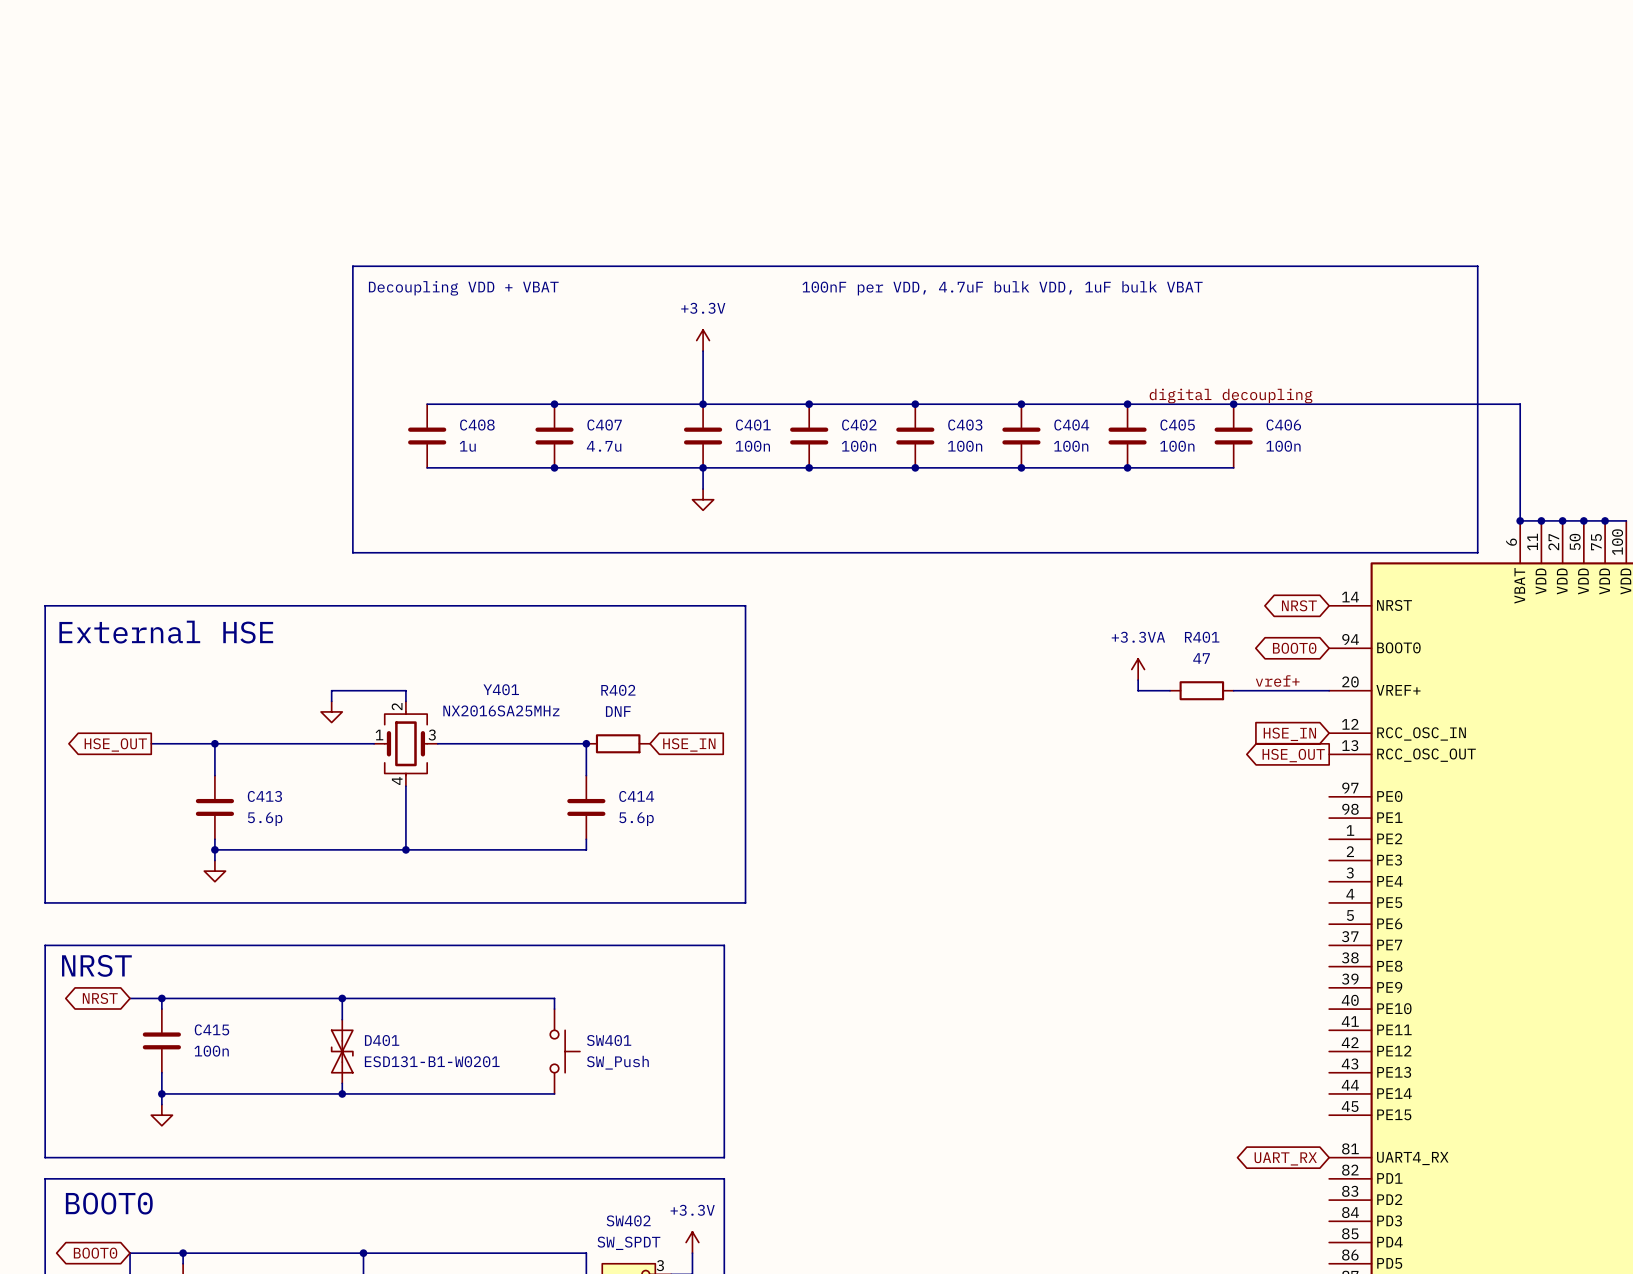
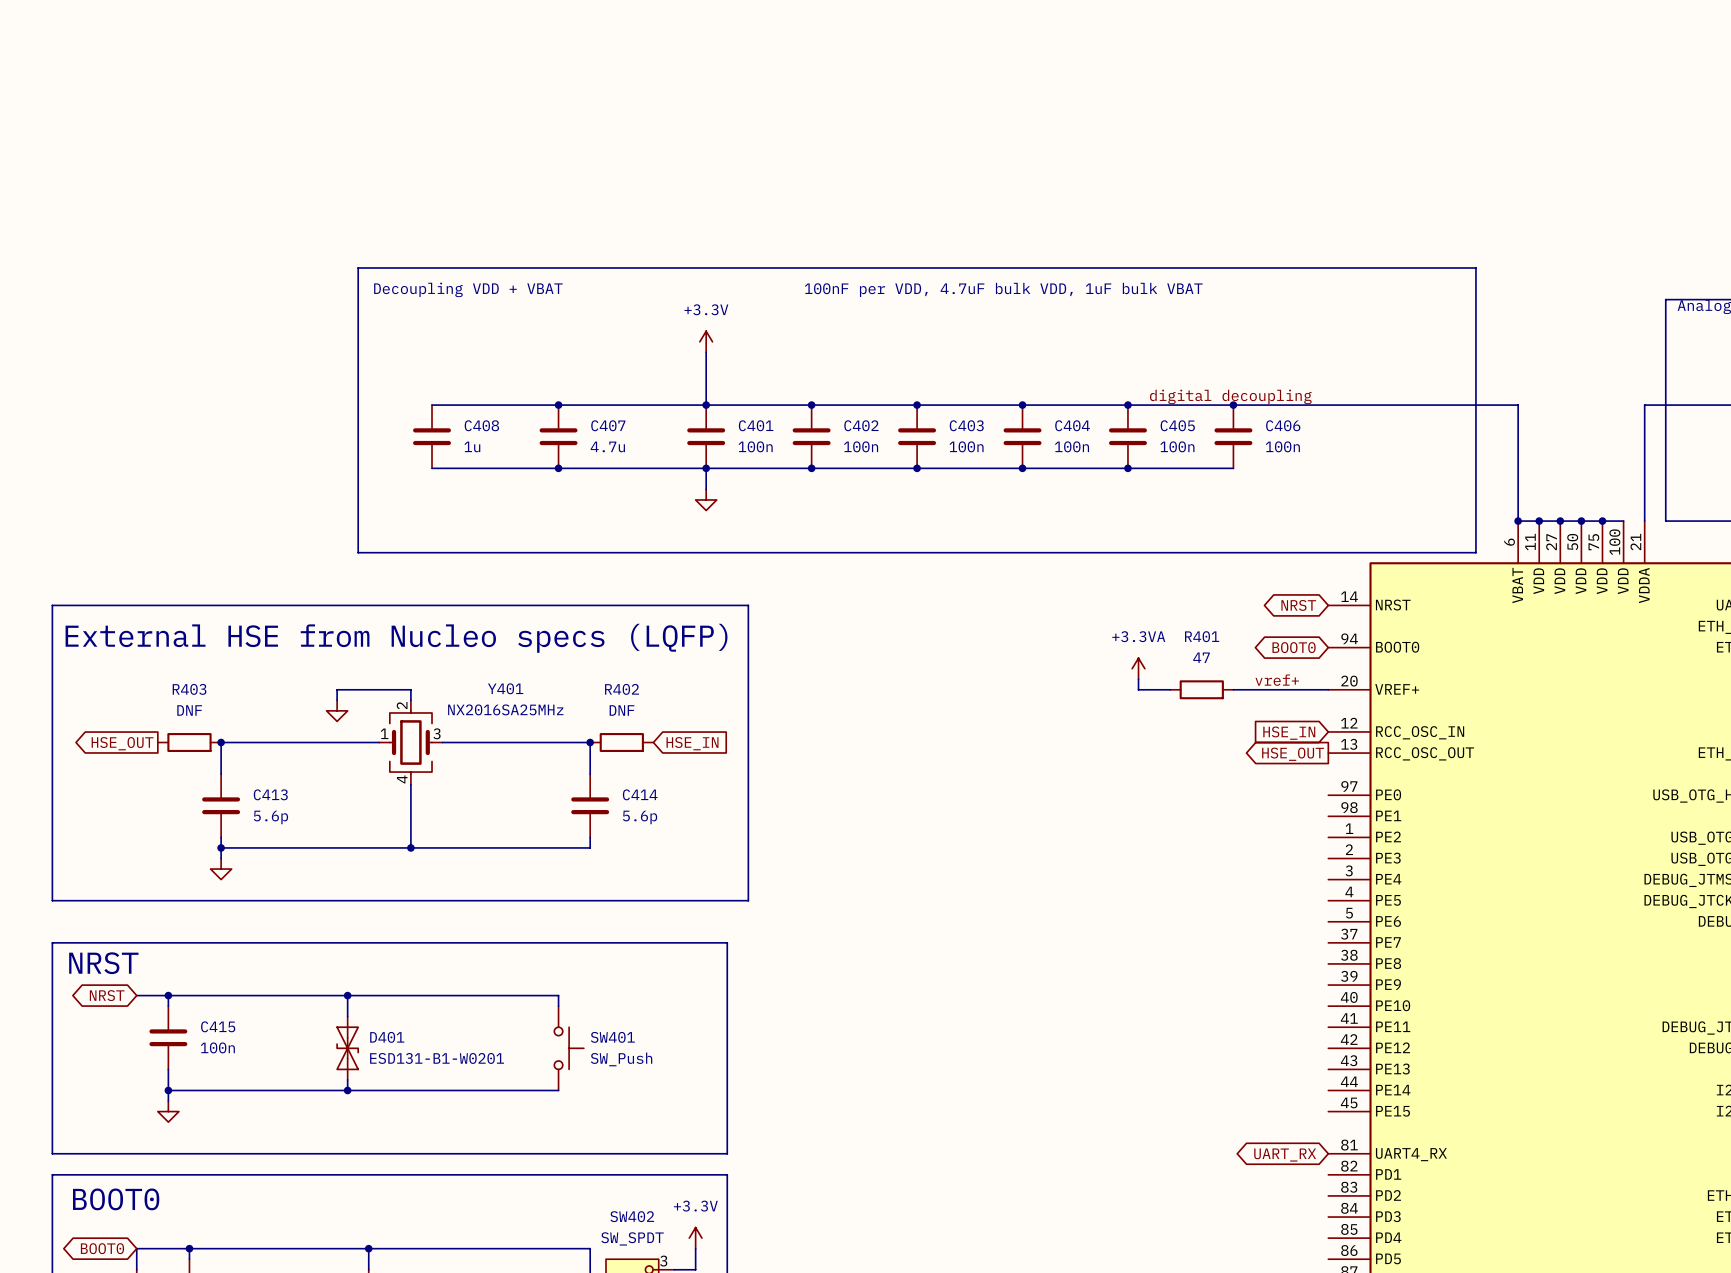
text: External HSE (166, 632) -> none
text: none -> External HSE from Nucleo specs (LQFP) (396, 638)
wire: (151, 743) (214, 743) -> none
R403: none -> DNF (189, 742)

